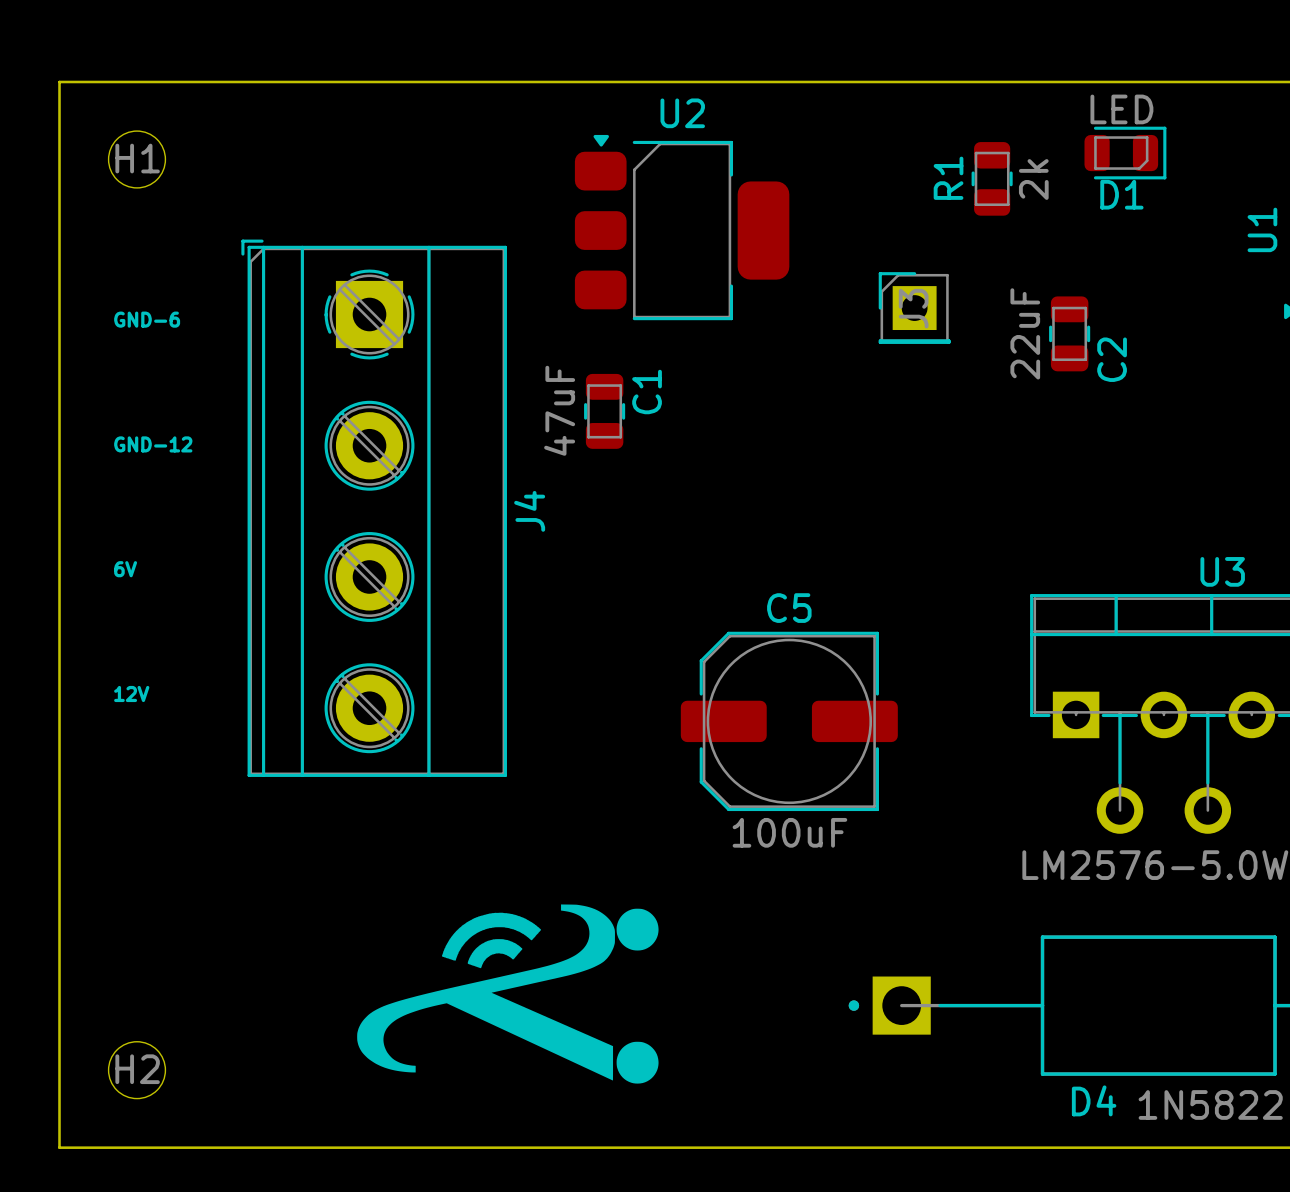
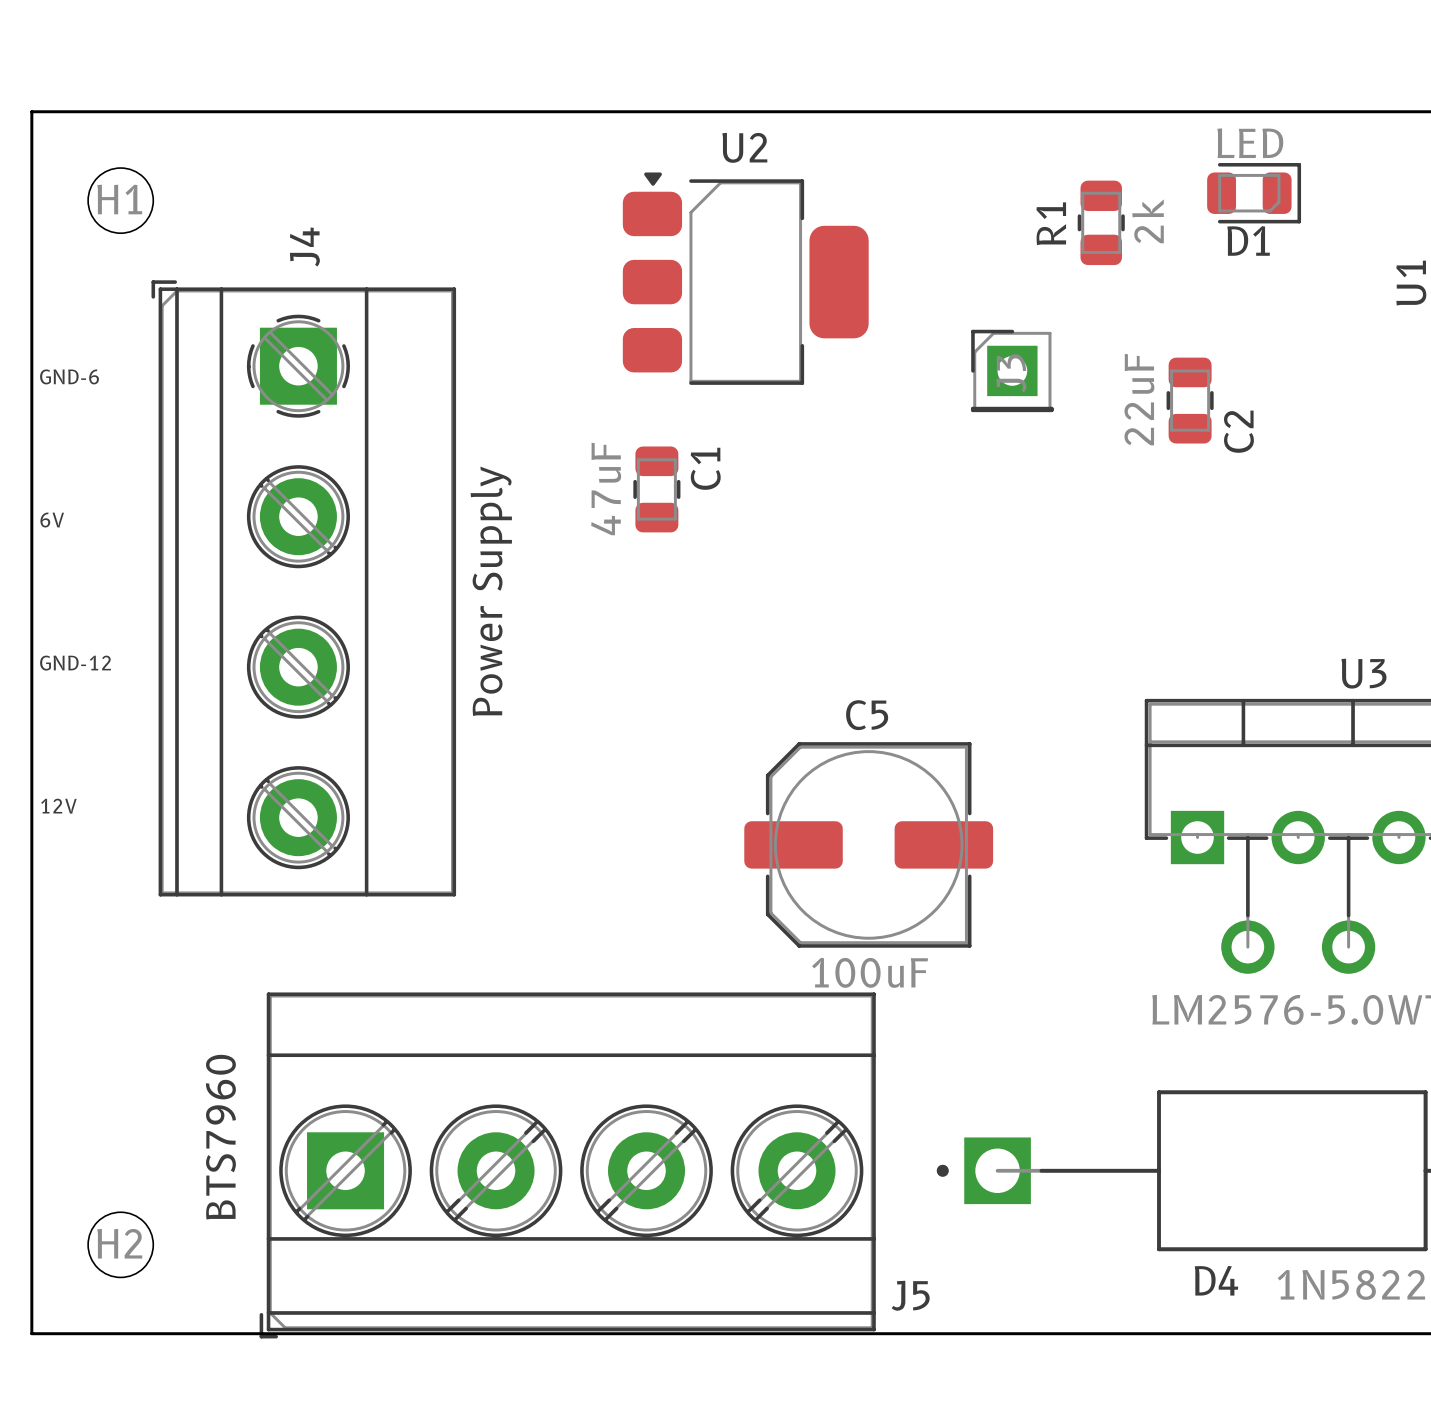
text position: GND-6 (147, 319) -> GND-6 (69, 376)
text position: GND-12 (153, 444) -> GND-12 (75, 663)
text: none -> Power Supply (491, 591)
J4 position: (374, 508) -> (303, 588)
J4 name position: J4 (529, 511) -> J4 (304, 247)
text position: 6V (125, 569) -> 6V (52, 520)
text position: 12V (131, 693) -> 12V (58, 806)
drawing: [357, 904, 659, 1084] -> none
text: none -> BTS7960 (220, 1137)
J5: none -> (567, 1165)

